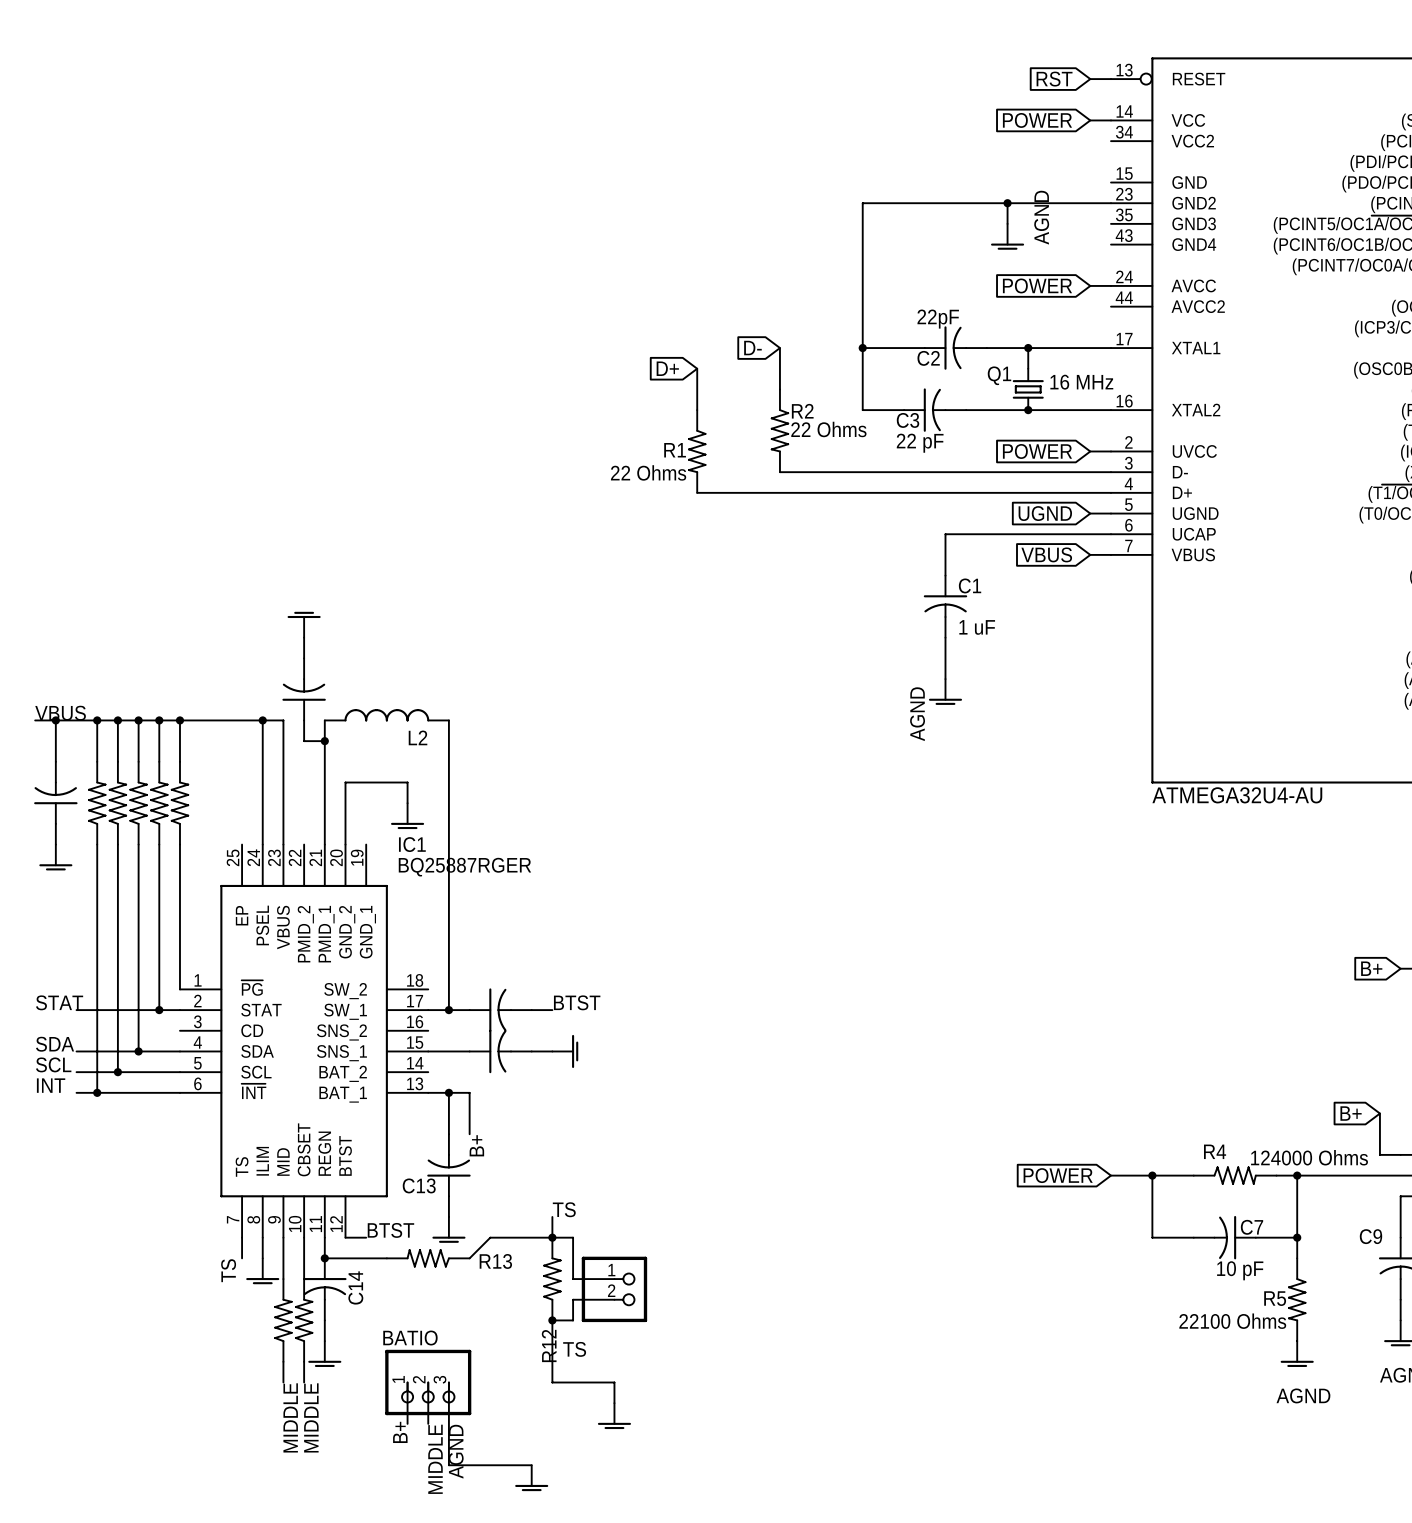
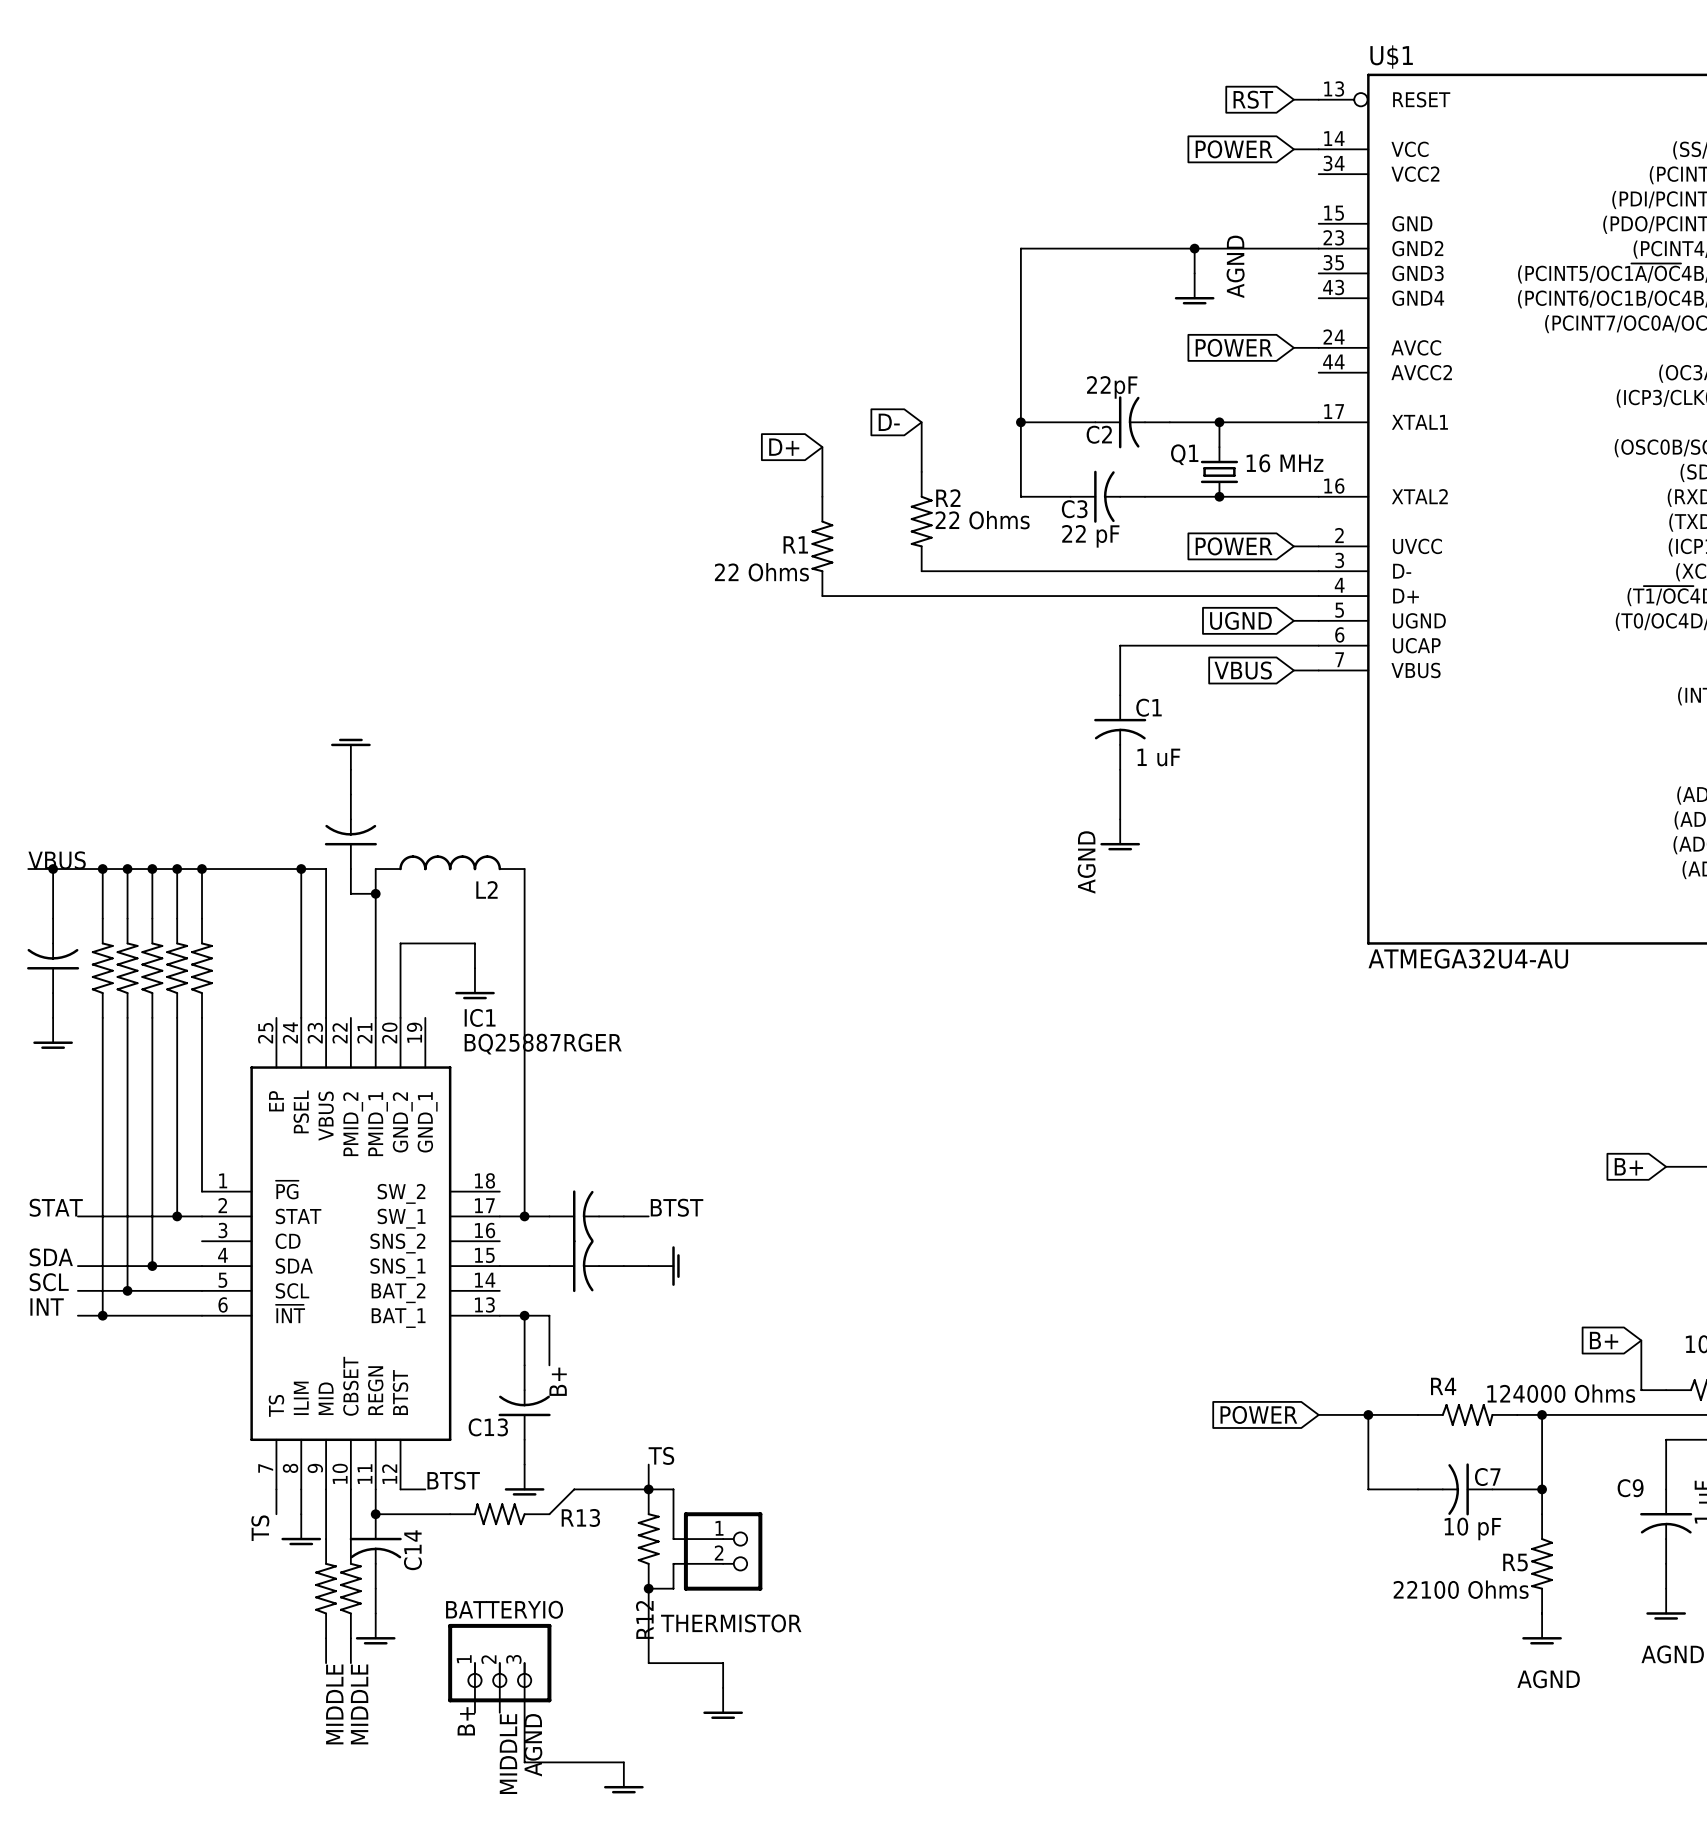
U$1 name: none -> U$1 (1391, 57)
BATIO name: BATIO (410, 1338) -> BATTERYIO (504, 1609)
TS name: TS (574, 1349) -> THERMISTOR (731, 1623)

